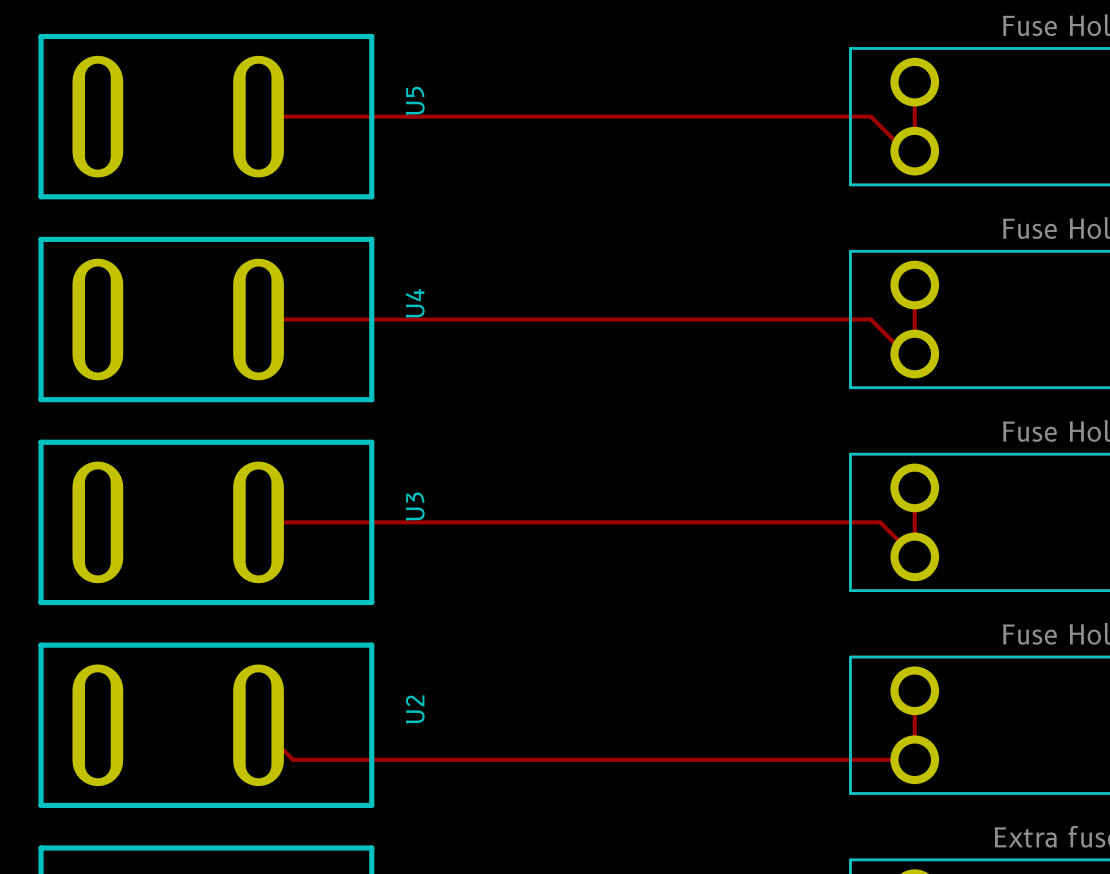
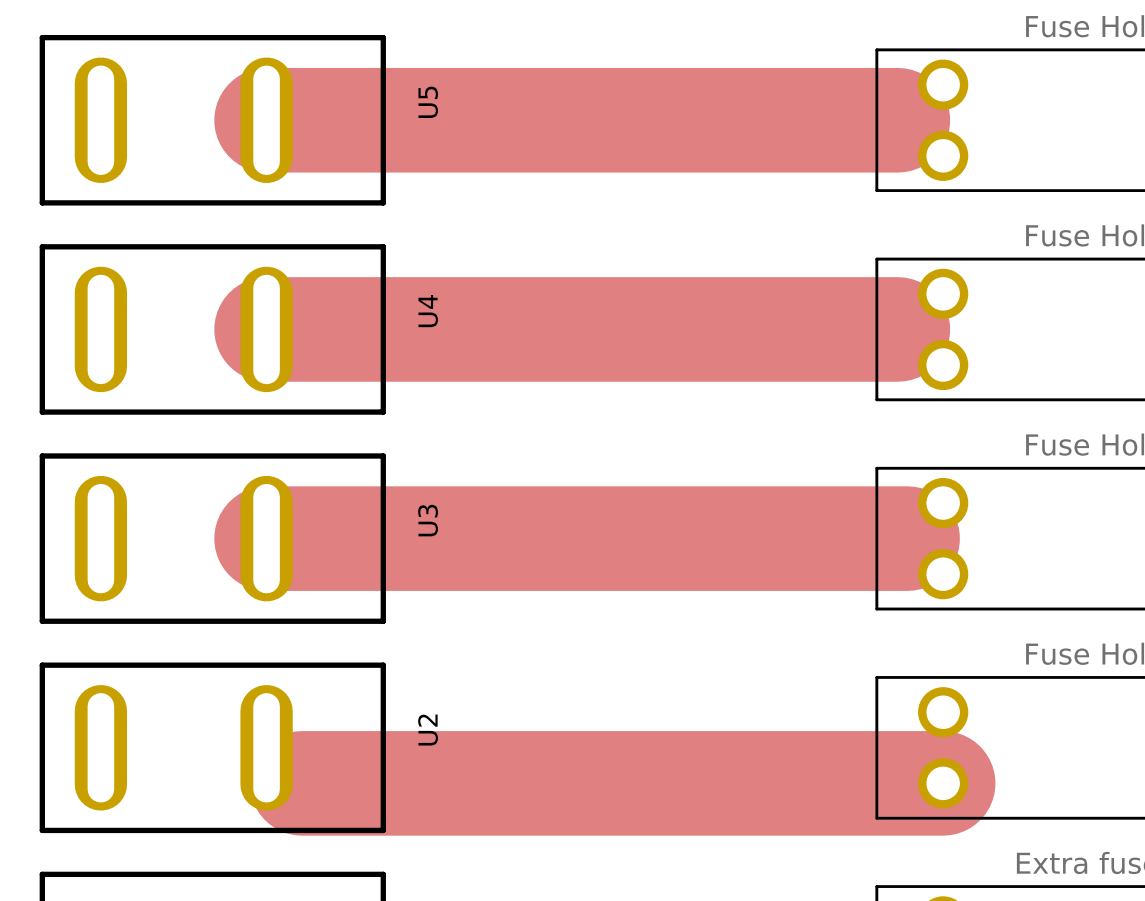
top track width: thin (258, 116) (870, 116) -> thick (266, 120) (897, 120)
top track width: thin (258, 319) (870, 319) -> thick (266, 329) (897, 329)
top track width: thin (258, 522) (880, 522) -> thick (266, 538) (907, 538)
top track width: thin (293, 759) (914, 759) -> thick (302, 783) (943, 783)

